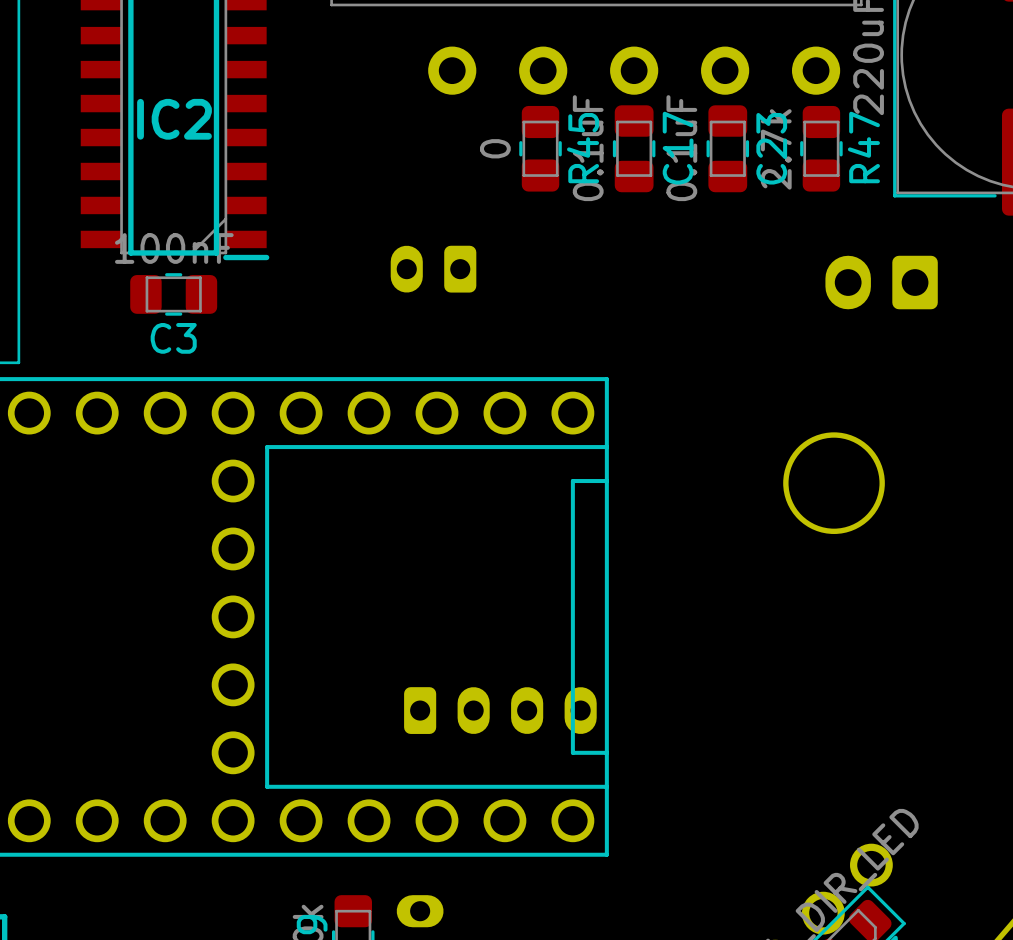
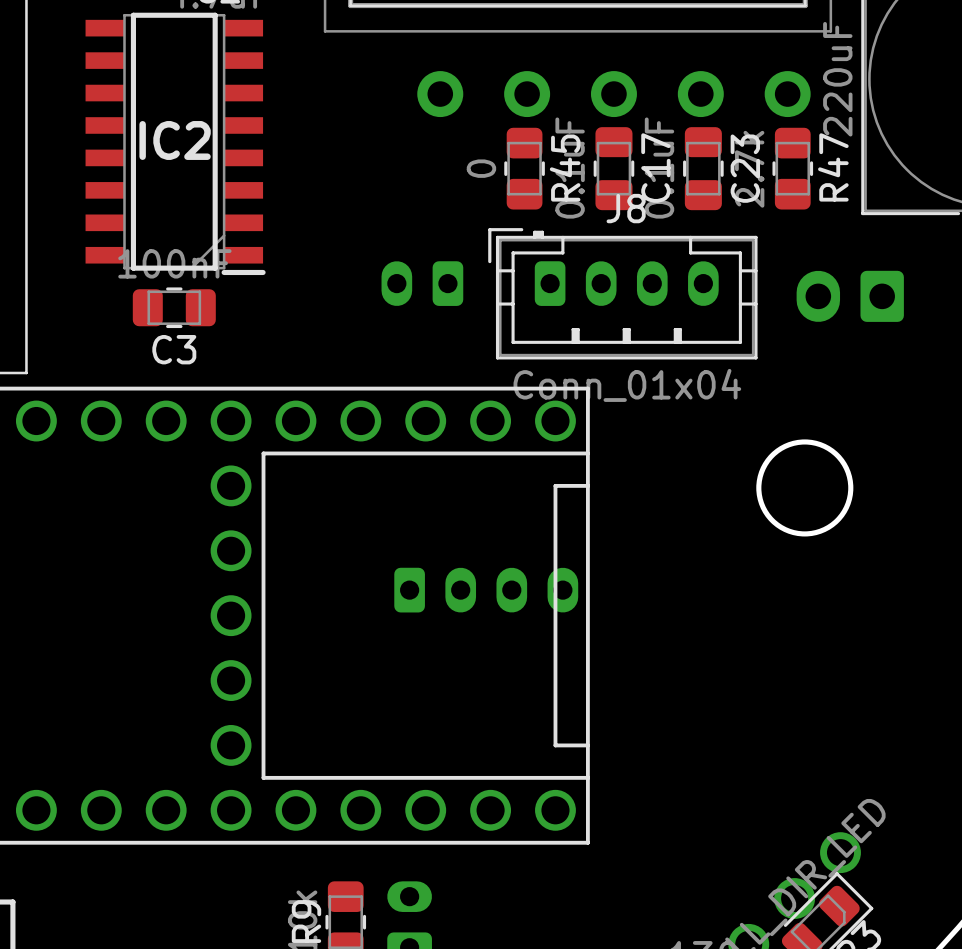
J8: none -> Conn_01x04 (622, 293)
part position: (500, 710) -> (486, 590)

